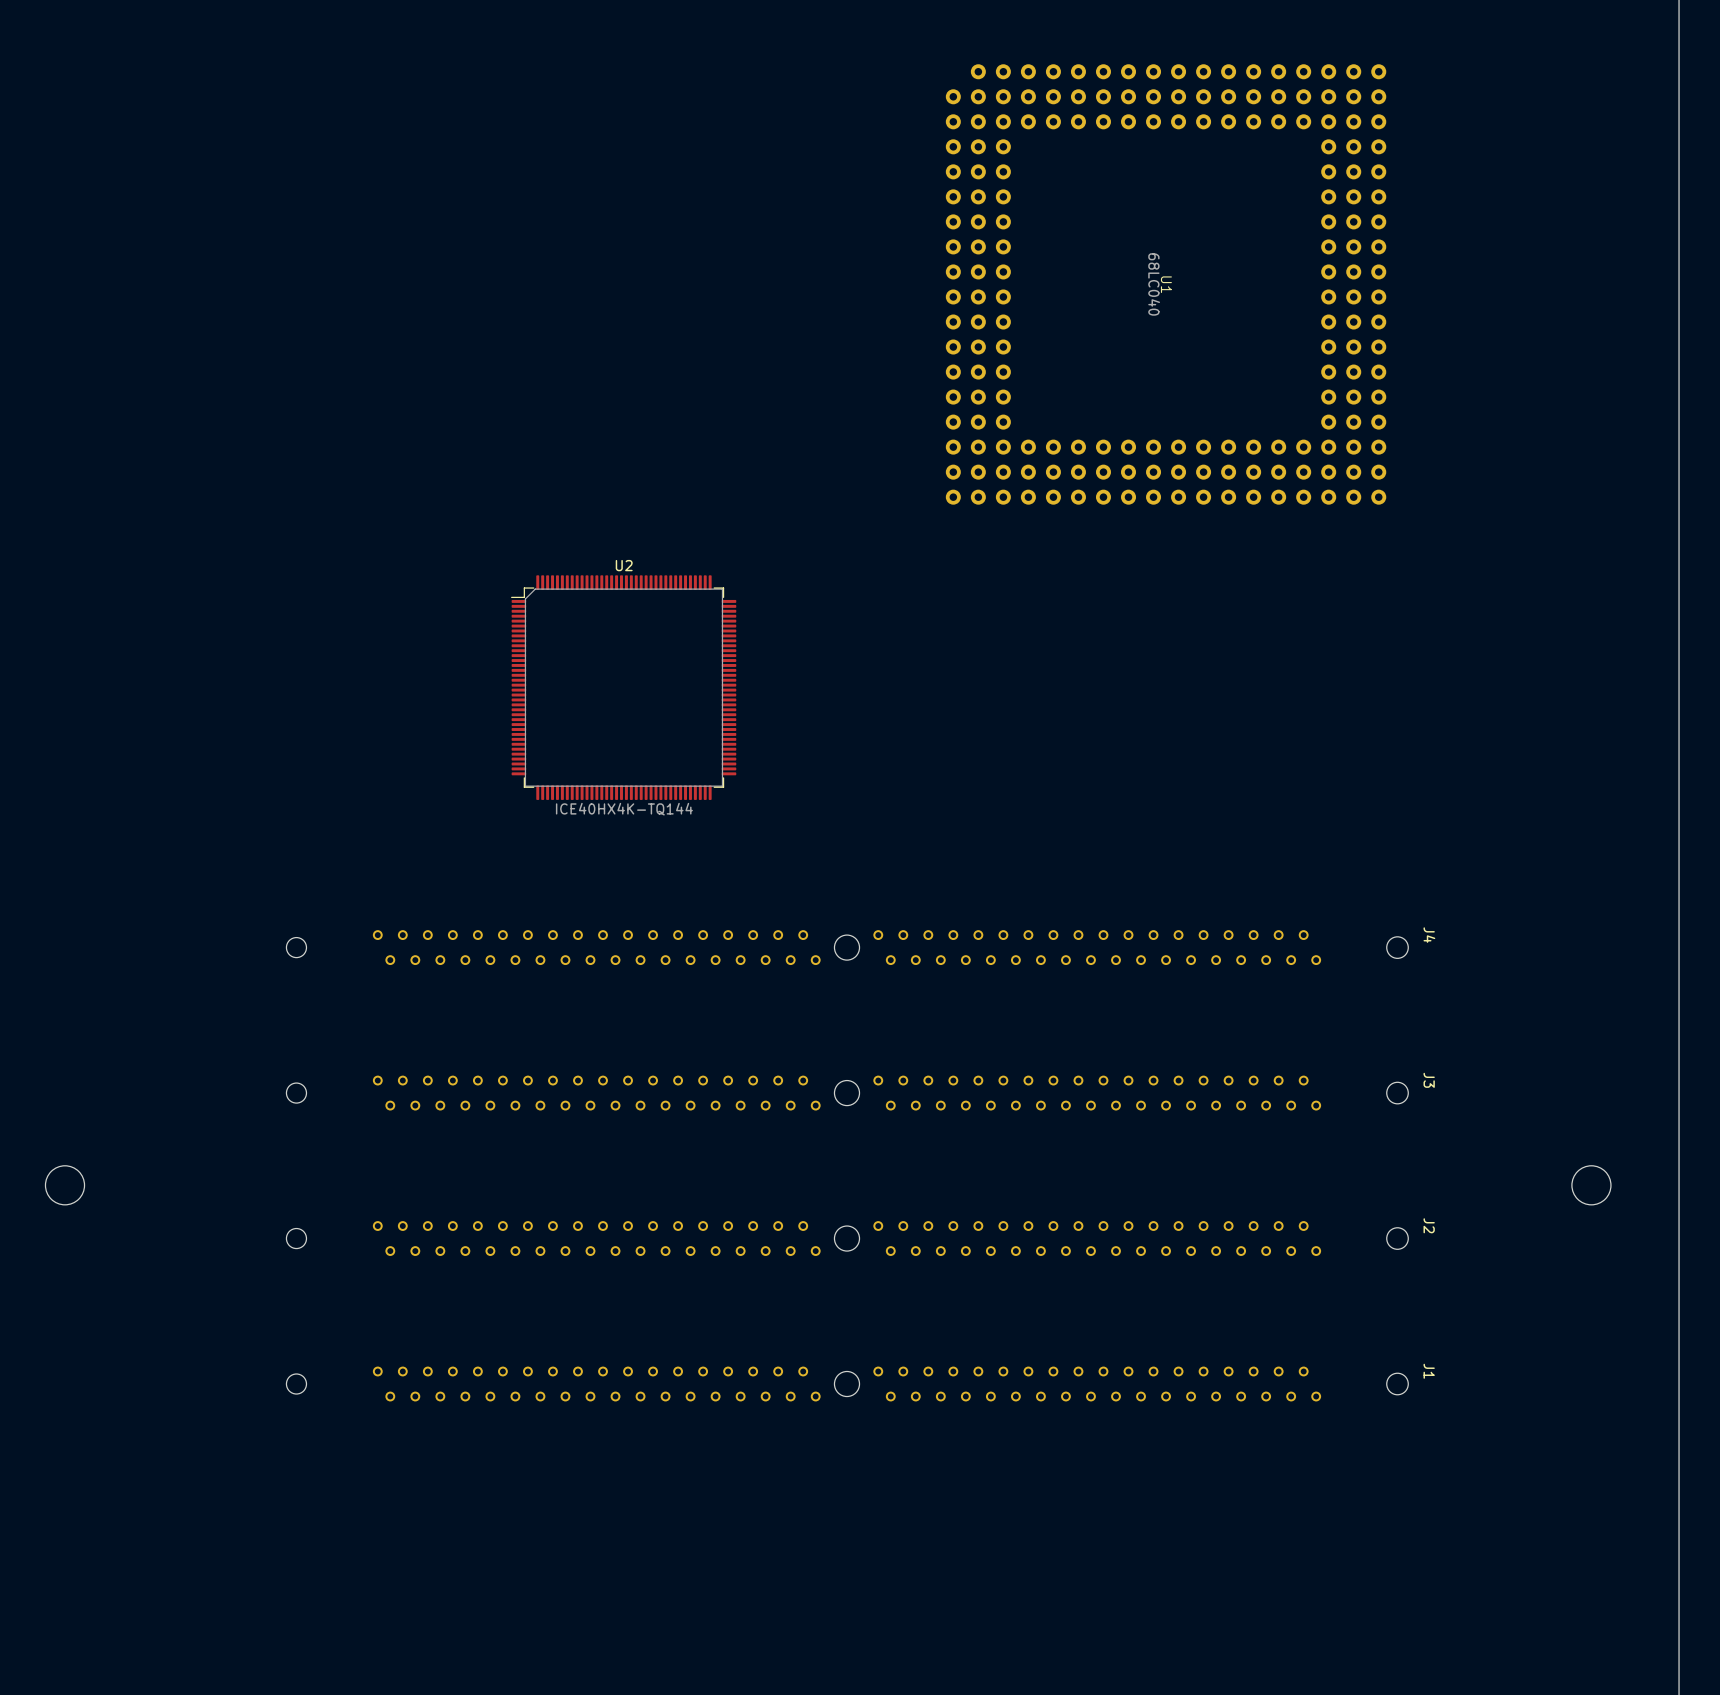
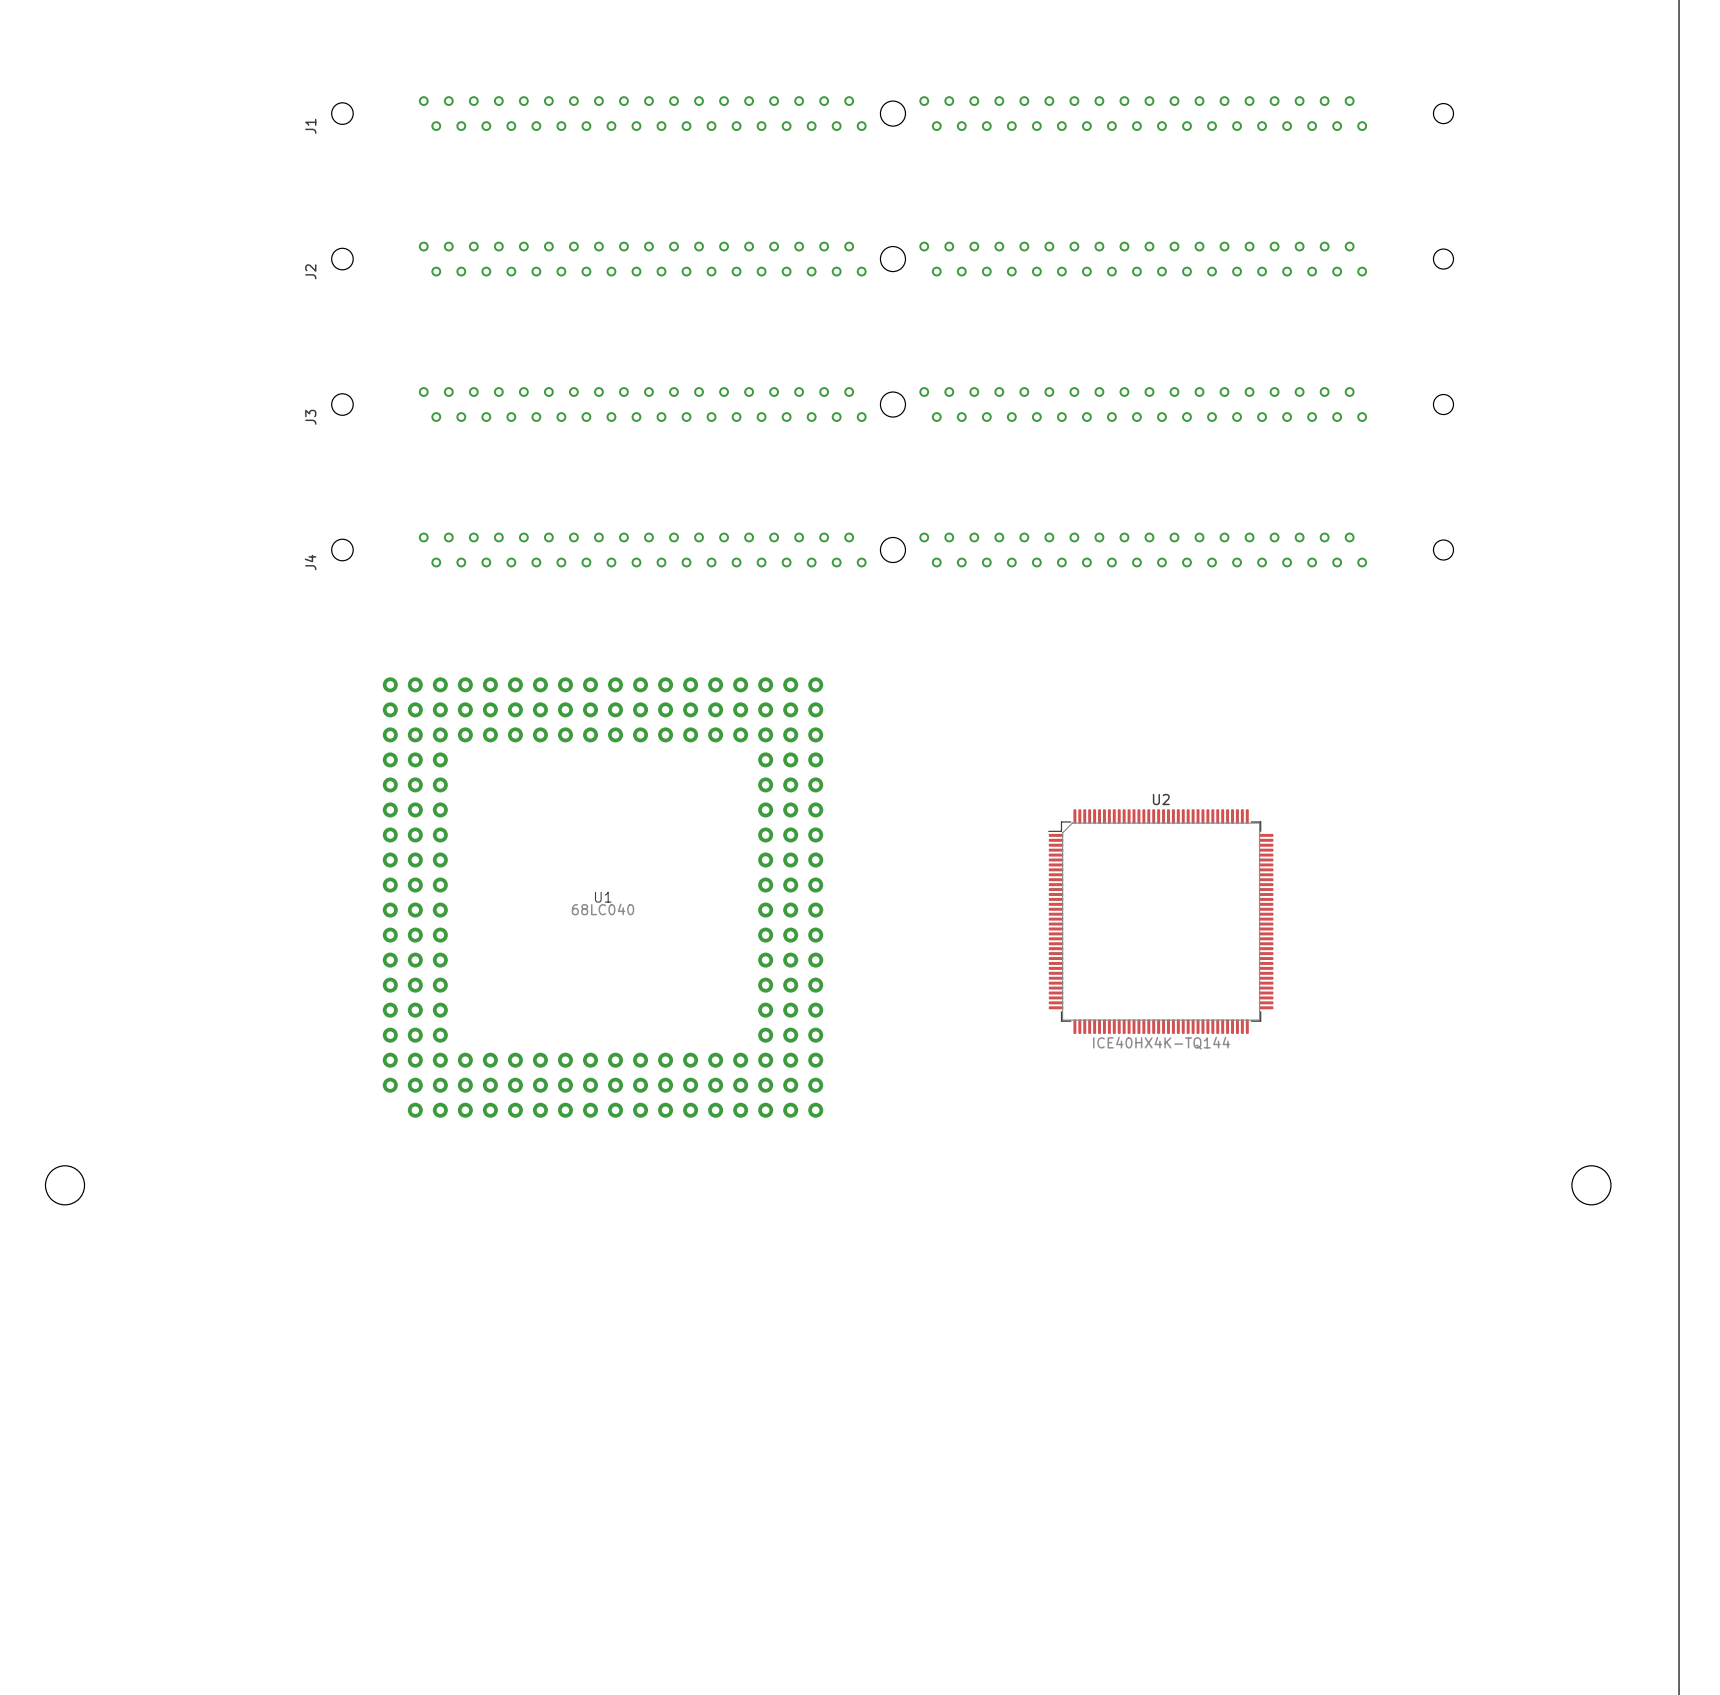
U1 rotation: 0° (1166, 284) -> 90° counterclockwise (603, 897)
U1 position: (1166, 284) -> (603, 897)
U2 position: (623, 687) -> (1160, 921)
J4 rotation: 0° (847, 947) -> 180° (892, 550)
J3 rotation: 0° (847, 1093) -> 180° (892, 404)
J3 position: (847, 1093) -> (892, 404)
J2 rotation: 0° (847, 1238) -> 180° (892, 259)
J2 position: (847, 1238) -> (892, 259)
J1 rotation: 0° (847, 1384) -> 180° (892, 113)
J1 position: (847, 1384) -> (892, 113)

